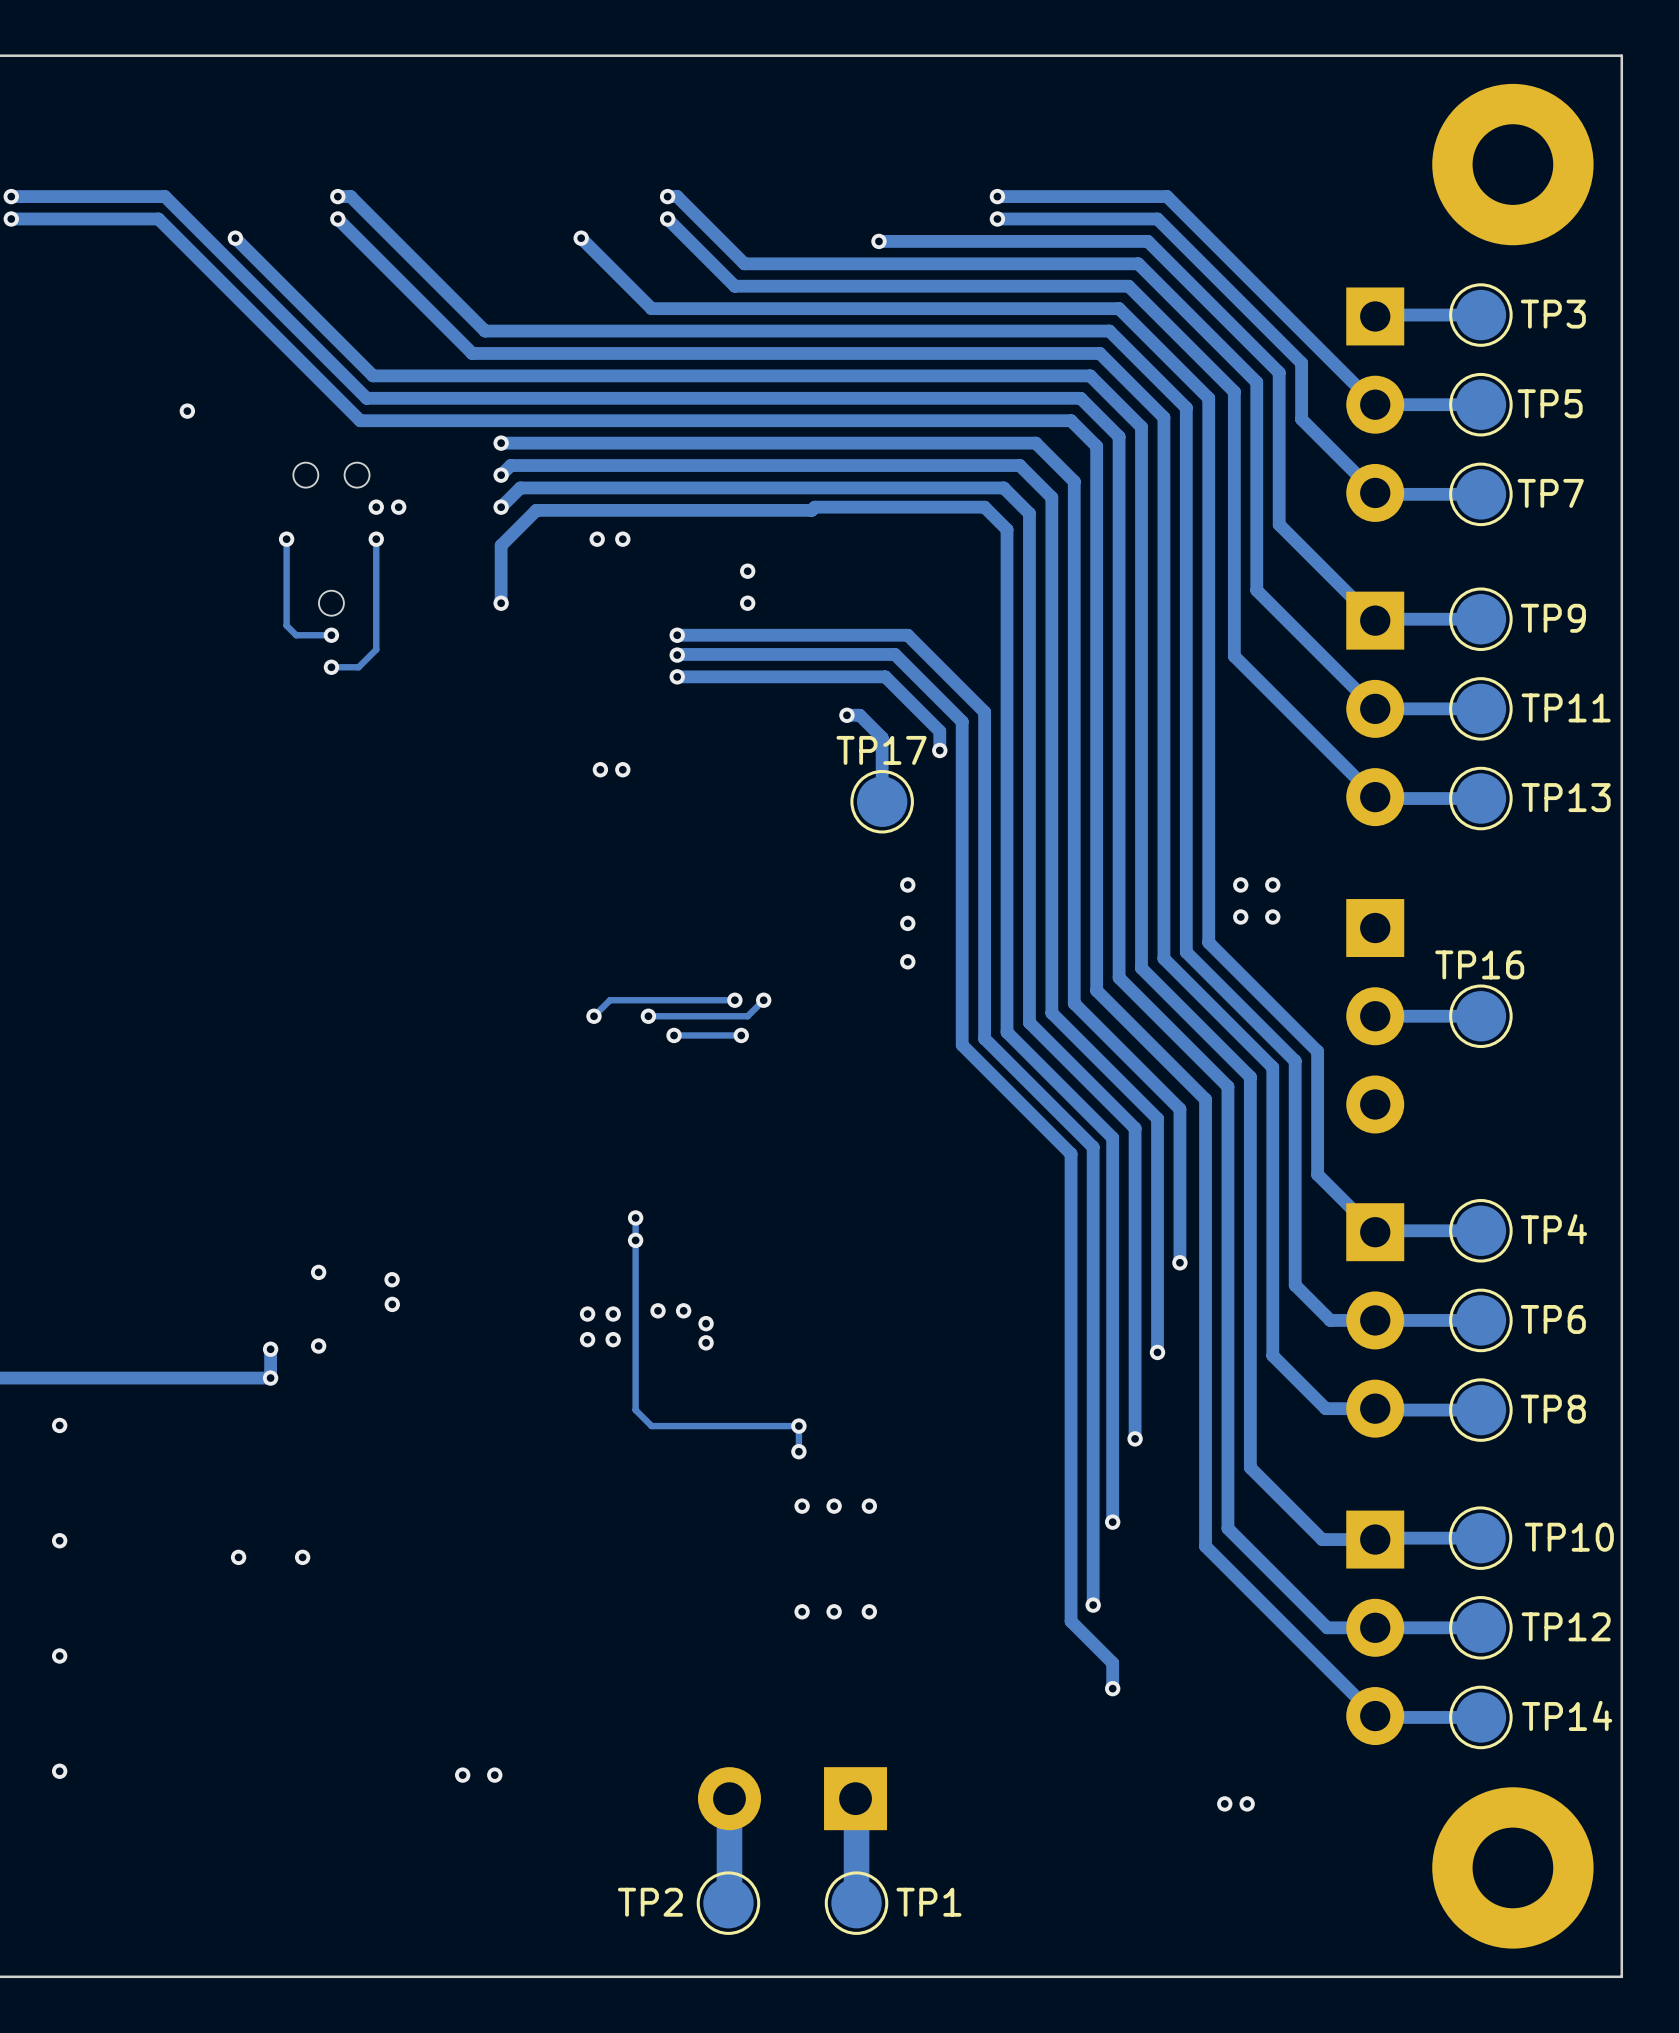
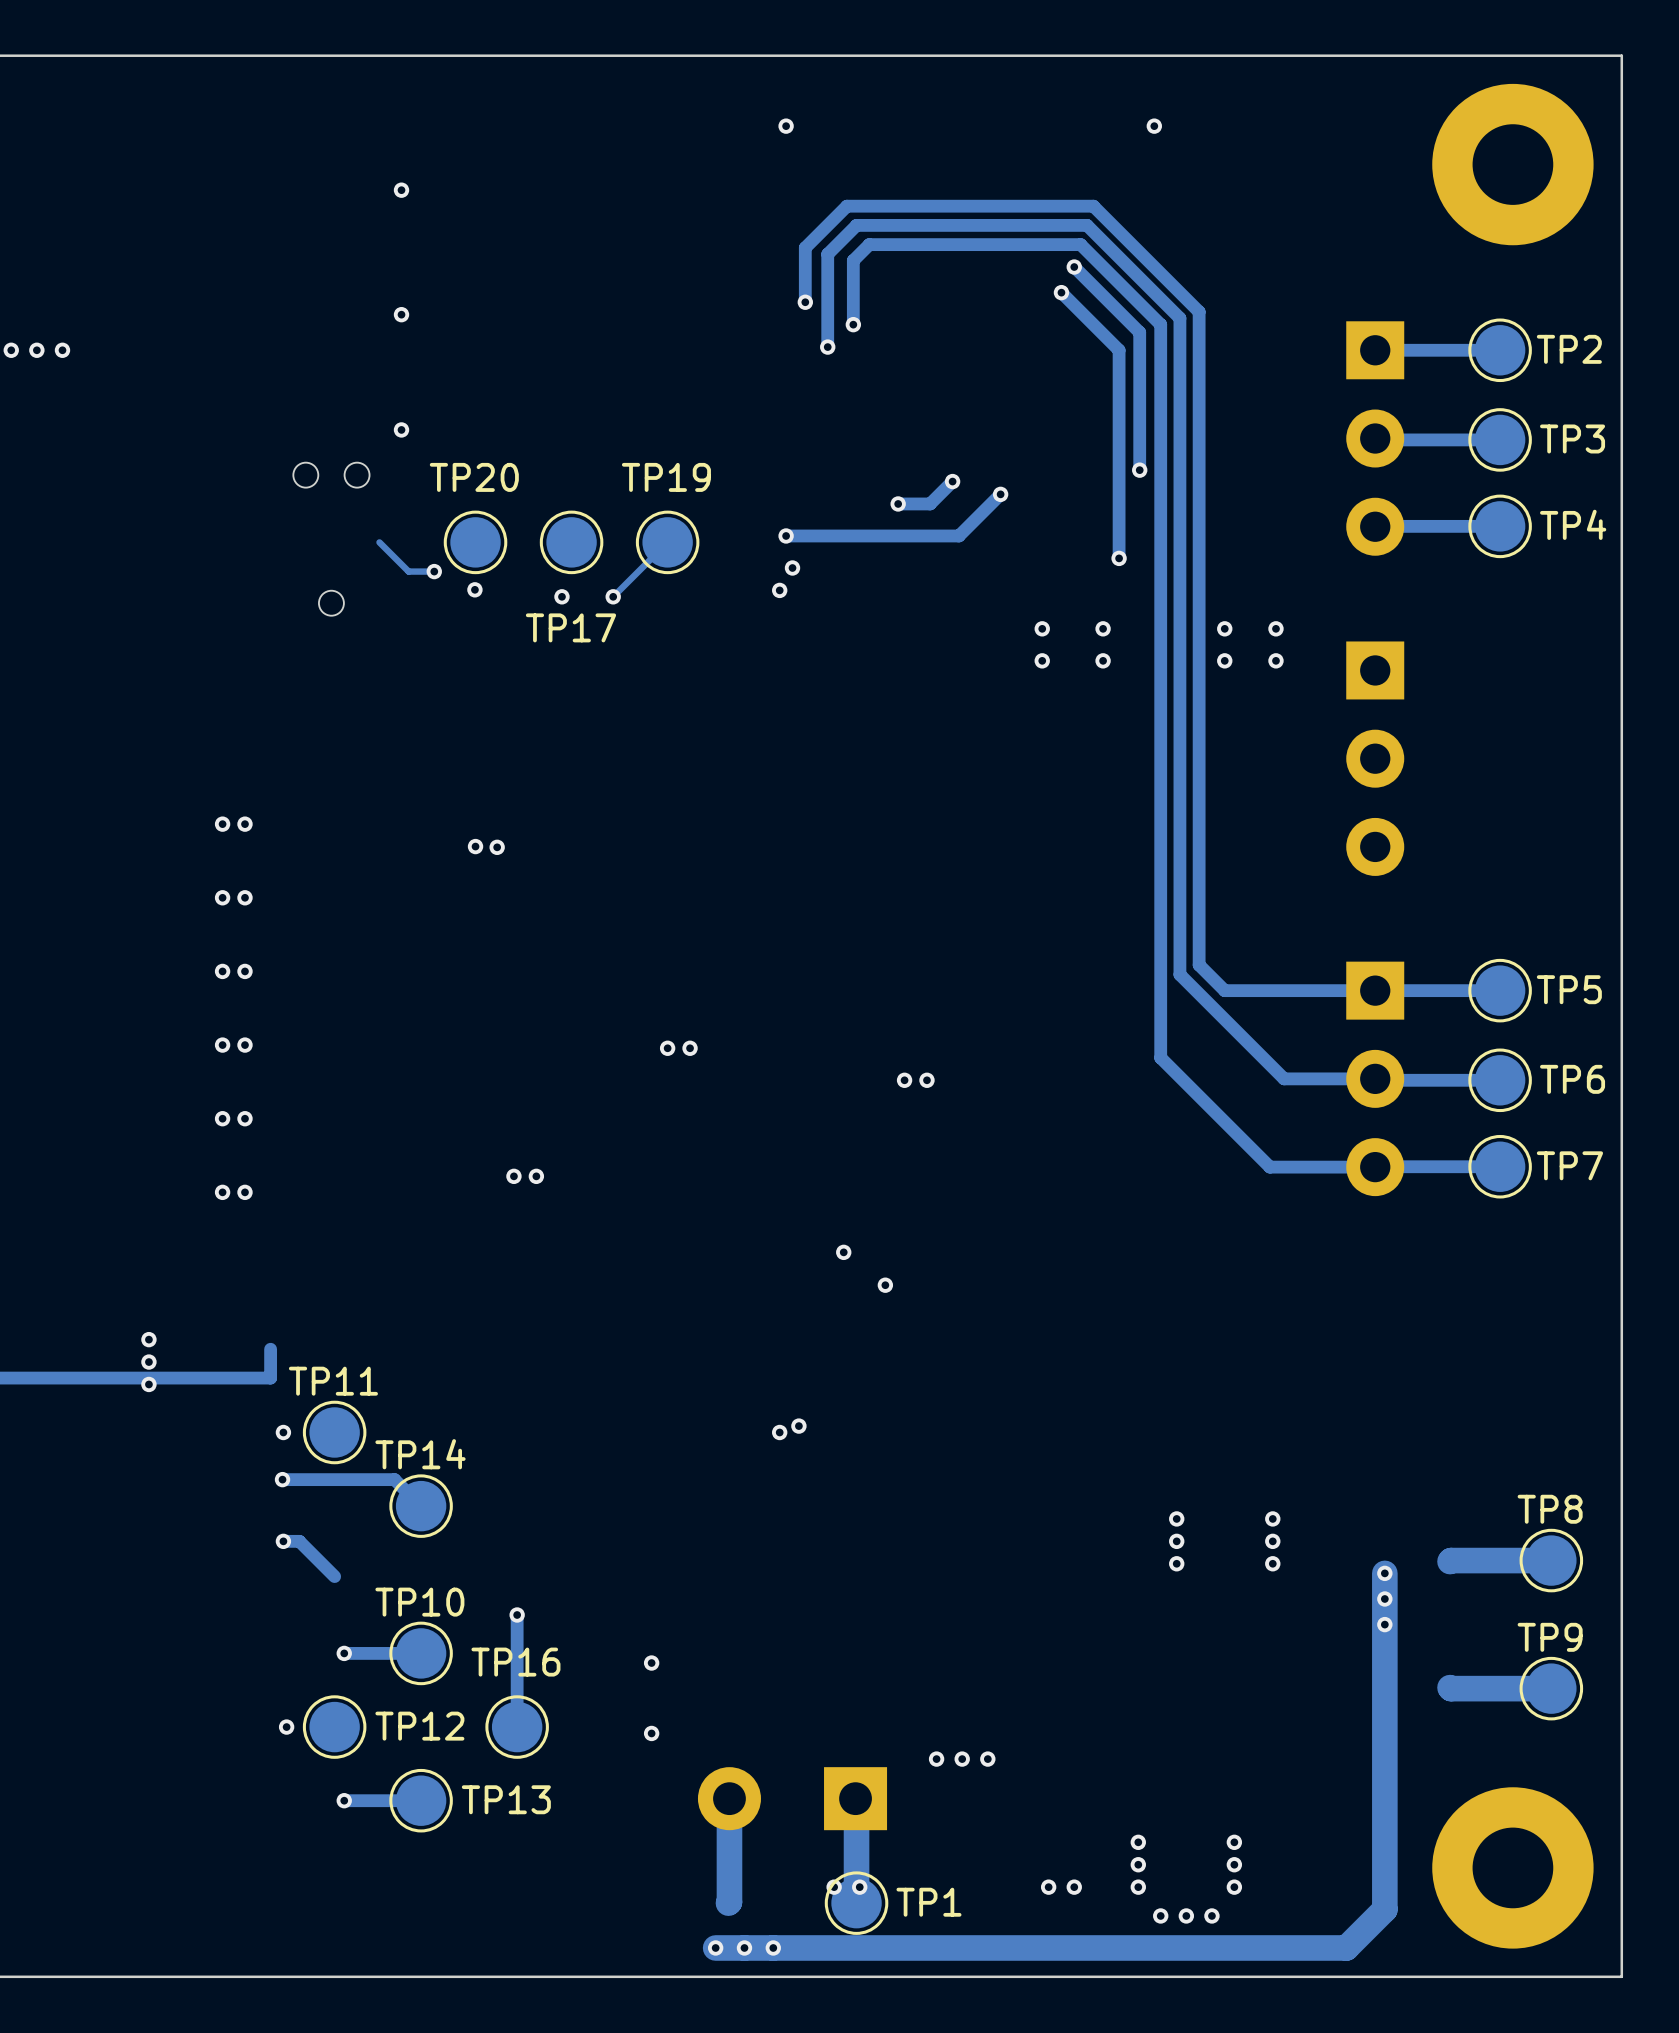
via: none -> (786, 126)
via: none -> (1154, 126)
via: none -> (401, 190)
track: (11, 196) (164, 196) (366, 398) (1080, 398) (1119, 436) -> (1061, 292) (1119, 350) (1119, 436)
via: (11, 196) -> none
track: (337, 196) (350, 196) (485, 331) (1109, 331) (1186, 407) (1186, 952) (1199, 965) -> (805, 302) (805, 247) (846, 206) (1093, 206) (1199, 311) (1199, 965)
via: (337, 196) -> none
track: (667, 196) (677, 196) (744, 263) (1138, 263) (1256, 382) (1256, 590) (1375, 708) (1480, 708) -> none
via: (667, 196) -> none
track: (997, 196) (1167, 196) (1375, 404) (1480, 404) -> none
via: (997, 196) -> none
track: (11, 219) (158, 219) (360, 420) (1071, 420) (1096, 446) (1096, 990) (1205, 1099) (1205, 1546) (1376, 1717) (1480, 1717) -> none
via: (11, 219) -> none
track: (337, 219) (472, 353) (1099, 353) (1163, 417) (1163, 958) (1179, 974) -> (827, 347) (827, 254) (856, 225) (1087, 225) (1179, 318) (1179, 974)
via: (337, 219) -> none
track: (667, 219) (734, 286) (1128, 286) (1234, 391) (1234, 656) (1376, 798) (1480, 798) -> none
via: (667, 219) -> none
track: (997, 219) (1157, 219) (1301, 363) (1301, 419) (1376, 494) (1480, 494) -> none
via: (997, 219) -> none
track: (235, 238) (373, 375) (1090, 375) (1141, 427) (1141, 968) (1250, 1077) (1250, 1467) (1322, 1539) (1480, 1538) -> none
via: (235, 238) -> none
track: (581, 238) (651, 308) (1119, 308) (1208, 398) (1208, 942) (1317, 1051) (1317, 1174) (1375, 1232) (1480, 1230) -> none
via: (581, 238) -> none
track: (878, 241) (1147, 241) (1279, 372) (1279, 524) (1375, 620) (1480, 619) -> none
via: (878, 241) -> none
track: none -> (1074, 267) (1139, 332) (1139, 470)
via: none -> (1074, 267)
via: none -> (1061, 292)
via: none -> (805, 302)
via: none -> (401, 314)
track: (1480, 315) (1375, 316) -> none
TP3 position: (1480, 315) -> (1500, 439)
track: none -> (853, 324) (853, 260) (869, 244) (1080, 244) (1160, 324) (1160, 1057) (1269, 1167) (1500, 1166)
via: none -> (853, 324)
via: none -> (827, 347)
via: none -> (11, 350)
via: none -> (36, 350)
via: none -> (62, 350)
track: none -> (1500, 350) (1375, 350)
part position: (1375, 404) -> (1375, 438)
TP5 position: (1480, 404) -> (1500, 990)
via: (187, 411) -> none
via: none -> (401, 429)
track: none -> (1375, 438) (1500, 439)
track: (501, 443) (1035, 443) (1074, 481) (1074, 1003) (1179, 1109) (1179, 1262) -> none
via: (501, 443) -> none
via: none -> (1139, 470)
track: (501, 475) (510, 465) (1019, 465) (1051, 497) (1051, 1013) (1157, 1118) (1157, 1352) -> none
via: (501, 475) -> none
track: none -> (952, 481) (930, 503) (898, 503)
via: none -> (952, 481)
track: none -> (1000, 494) (959, 535) (786, 535)
via: none -> (1000, 494)
TP7 position: (1480, 494) -> (1500, 1166)
via: none -> (898, 503)
via: (376, 507) -> none
via: (398, 507) -> none
track: (501, 507) (520, 487) (1003, 487) (1029, 513) (1029, 1022) (1135, 1128) (1135, 1438) -> none
via: (501, 507) -> none
track: none -> (1500, 526) (1375, 526)
via: none -> (786, 535)
track: (286, 539) (286, 625) (296, 635) (331, 635) -> none
via: (286, 539) -> none
track: (376, 539) (376, 649) (358, 667) (331, 667) -> none
via: (376, 539) -> none
via: (597, 539) -> none
via: (622, 539) -> none
track: none -> (379, 542) (408, 571) (434, 571)
TP20: none -> (475, 542)
track: none -> (667, 542) (613, 596)
TP19: none -> (667, 542)
track: (1119, 558) (1119, 977) (1227, 1086) (1227, 1528) (1327, 1627) (1480, 1627) -> none
via: none -> (1119, 558)
via: none -> (792, 568)
via: none -> (434, 571)
via: (747, 571) -> none
via: none -> (779, 590)
via: none -> (561, 596)
via: none -> (613, 596)
track: (501, 603) (501, 545) (536, 510) (811, 510) (814, 507) (984, 507) (1007, 529) (1007, 1032) (1112, 1137) (1112, 1522) -> none
via position: (501, 603) -> (474, 589)
via: (747, 603) -> none
TP9 name position: TP9 (1553, 618) -> TP9 (1550, 1637)
TP9 position: (1480, 619) -> (1551, 1688)
via: none -> (1042, 628)
via: none -> (1103, 628)
via: none -> (1224, 628)
via: none -> (1275, 628)
via: (331, 635) -> none
track: (677, 635) (907, 635) (984, 712) (984, 1038) (1093, 1147) (1093, 1605) -> none
via: (677, 635) -> none
track: (677, 655) (894, 654) (962, 721) (962, 1045) (1071, 1153) (1071, 1621) (1112, 1663) (1112, 1688) -> none
via: (677, 655) -> none
via: none -> (1042, 660)
via: none -> (1103, 660)
via: none -> (1224, 660)
via: none -> (1275, 660)
via: (331, 667) -> none
track: (677, 676) (885, 676) (939, 731) (939, 750) -> none
via: (677, 676) -> none
TP11 name position: TP11 (1566, 707) -> TP11 (333, 1381)
part position: (1375, 708) -> (1375, 758)
TP11 position: (1480, 708) -> (334, 1432)
track: (846, 715) (859, 715) (882, 737) (882, 801) -> none
via: (846, 715) -> none
TP17 name position: TP17 (881, 750) -> TP17 (570, 627)
via: (939, 750) -> none
via: (600, 769) -> none
via: (622, 769) -> none
TP13 position: (1480, 798) -> (421, 1800)
TP17 position: (882, 801) -> (571, 542)
via: none -> (222, 824)
via: none -> (244, 824)
via: none -> (475, 846)
via: none -> (497, 847)
via: (907, 884) -> none
via: (1240, 884) -> none
via: (1272, 884) -> none
via: none -> (222, 897)
via: none -> (244, 897)
via: (1240, 917) -> none
via: (1272, 917) -> none
via: (907, 923) -> none
via: (907, 961) -> none
TP16 name position: TP16 (1479, 964) -> TP16 (515, 1662)
via: none -> (222, 971)
via: none -> (244, 971)
track: (1224, 990) (1295, 1061) (1295, 1285) (1330, 1320) (1480, 1320) -> (1224, 990) (1500, 990)
track: (734, 1000) (610, 1000) (593, 1016) -> none
via: (734, 1000) -> none
track: (763, 1000) (747, 1016) (648, 1016) -> none
via: (763, 1000) -> none
via: (593, 1016) -> none
via: (648, 1016) -> none
part position: (1375, 1016) -> (1375, 1078)
track: (1480, 1016) (1375, 1016) -> none
TP16 position: (1480, 1016) -> (517, 1727)
via position: (674, 1035) -> (667, 1048)
track: (741, 1035) (674, 1035) -> none
via: (741, 1035) -> none
via: none -> (222, 1045)
via: none -> (244, 1045)
via: none -> (690, 1048)
track: (1272, 1067) (1272, 1355) (1325, 1408) (1480, 1410) -> (1272, 1067) (1284, 1078) (1500, 1080)
via: none -> (904, 1080)
via: none -> (926, 1080)
via: none -> (222, 1118)
via: none -> (244, 1118)
via: none -> (513, 1176)
via: none -> (536, 1176)
via: none -> (222, 1192)
via: none -> (244, 1192)
track: (635, 1217) (635, 1410) (651, 1426) (798, 1426) (798, 1451) -> none
via: (635, 1217) -> none
TP4 position: (1480, 1230) -> (1500, 526)
via: (635, 1240) -> none
via: none -> (843, 1252)
via: (1179, 1262) -> none
via: (318, 1272) -> none
via: (392, 1279) -> none
via: none -> (885, 1285)
via: (392, 1304) -> none
via: (658, 1310) -> none
via: (683, 1310) -> none
via: (587, 1314) -> none
via: (613, 1314) -> none
part: (1375, 1320) -> none
TP6 position: (1480, 1320) -> (1500, 1080)
via: (706, 1323) -> none
via: none -> (148, 1339)
via: (587, 1339) -> none
via: (613, 1339) -> none
via: (706, 1342) -> none
via: (318, 1346) -> none
via: (270, 1349) -> none
via: (1157, 1352) -> none
via: none -> (148, 1362)
via: (270, 1378) -> none
via: none -> (148, 1384)
TP8 name position: TP8 (1553, 1409) -> TP8 (1550, 1509)
TP8 position: (1480, 1410) -> (1551, 1560)
via: (59, 1425) -> none
via: none -> (283, 1432)
via: (1135, 1438) -> none
via position: (798, 1451) -> (779, 1432)
track: none -> (282, 1479) (394, 1479) (421, 1506)
via: none -> (282, 1479)
via: (802, 1506) -> none
via: (834, 1506) -> none
via: (869, 1506) -> none
via: none -> (1176, 1518)
via: none -> (1272, 1518)
via: (1112, 1522) -> none
TP10 name position: TP10 (1569, 1537) -> TP10 (419, 1602)
TP10 position: (1480, 1538) -> (421, 1653)
via: (59, 1540) -> none
track: none -> (283, 1541) (299, 1541) (334, 1576)
via: none -> (283, 1541)
via: none -> (1176, 1541)
via: none -> (1272, 1541)
via: (238, 1557) -> none
via: (302, 1557) -> none
track: none -> (1551, 1560) (1450, 1561)
via: none -> (1176, 1563)
via: none -> (1272, 1563)
track: none -> (1384, 1573) (1384, 1909) (1346, 1947) (715, 1947)
via: none -> (1384, 1573)
via: none -> (1384, 1598)
via: (1093, 1605) -> none
via: (802, 1611) -> none
via: (834, 1611) -> none
via: (869, 1611) -> none
track: none -> (517, 1614) (517, 1727)
via: none -> (517, 1614)
via: none -> (1384, 1624)
part: (1375, 1627) -> none
TP12 position: (1480, 1627) -> (334, 1727)
via: none -> (344, 1653)
track: none -> (421, 1653) (344, 1653)
via: (59, 1656) -> none
via: none -> (651, 1663)
track: none -> (1450, 1687) (1551, 1688)
via: (1112, 1688) -> none
TP14 name position: TP14 (1567, 1715) -> TP14 (420, 1454)
TP14 position: (1480, 1717) -> (421, 1506)
via: none -> (286, 1727)
via: none -> (651, 1733)
via: none -> (936, 1759)
via: none -> (962, 1759)
via: none -> (987, 1759)
via: (59, 1771) -> none
via: (462, 1775) -> none
via: (494, 1775) -> none
via: none -> (344, 1800)
track: none -> (421, 1800) (344, 1800)
via: (1224, 1803) -> none
via: (1247, 1803) -> none
via: none -> (1138, 1842)
via: none -> (1234, 1842)
via: none -> (1138, 1864)
via: none -> (1234, 1864)
via: none -> (834, 1887)
via: none -> (859, 1887)
via: none -> (1048, 1887)
via: none -> (1074, 1887)
via: none -> (1138, 1887)
via: none -> (1234, 1887)
TP2 name position: TP2 (650, 1902) -> TP2 (1569, 349)
TP2 position: (728, 1903) -> (1500, 350)
via: none -> (1160, 1915)
via: none -> (1186, 1915)
via: none -> (1211, 1915)
via: none -> (715, 1947)
via: none -> (744, 1947)
via: none -> (773, 1947)

